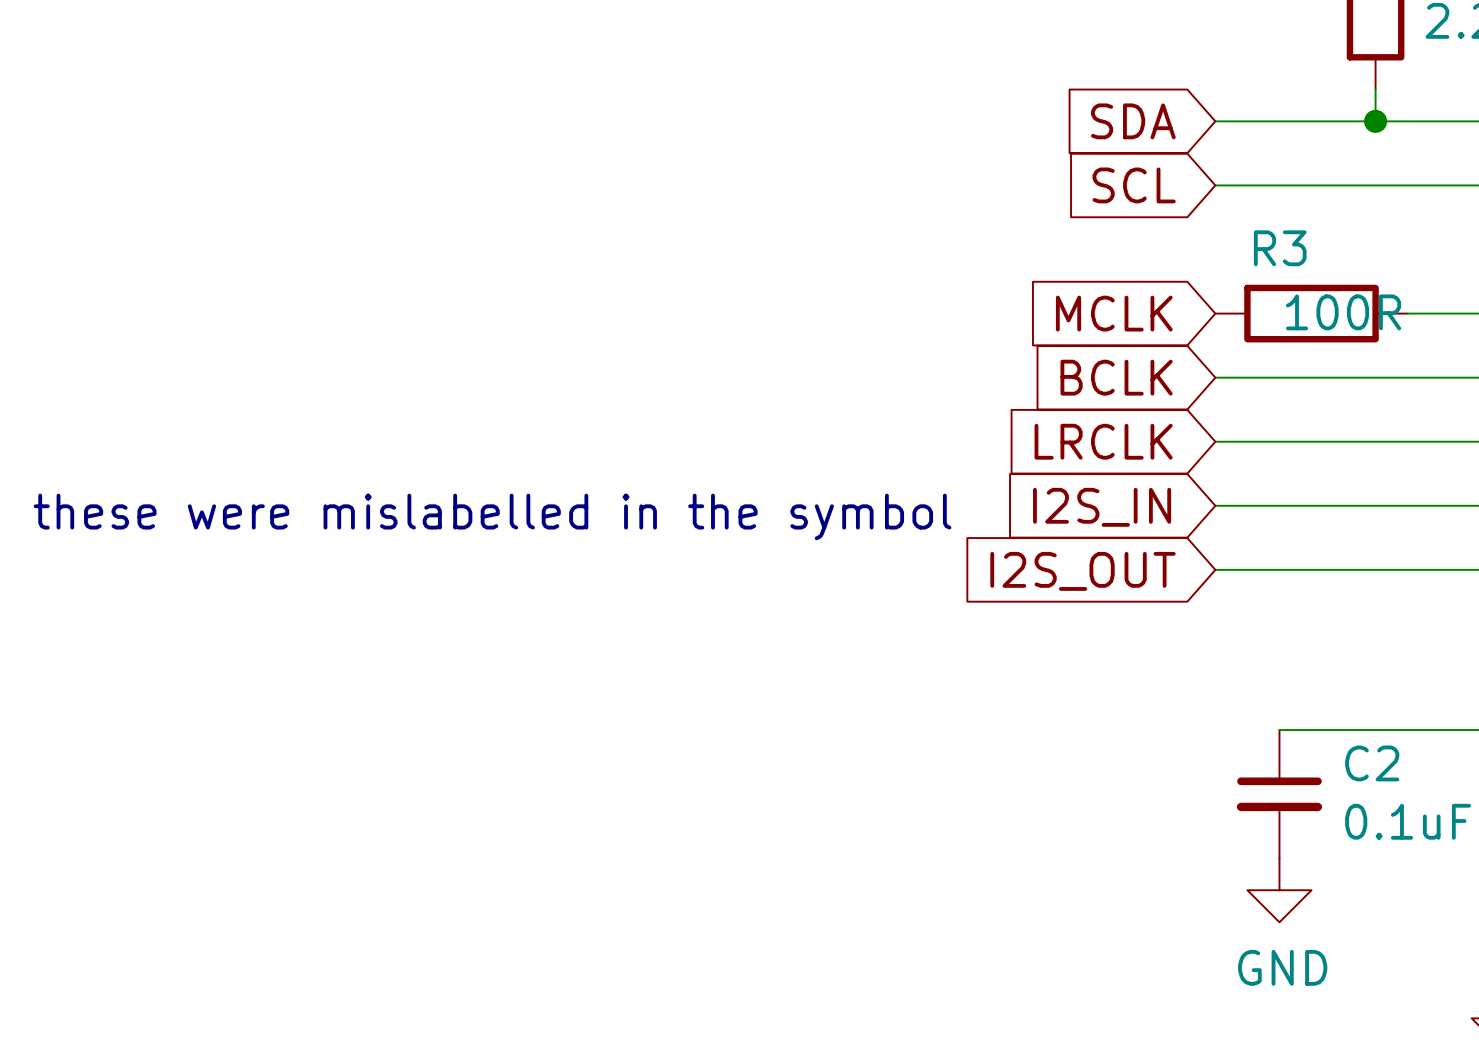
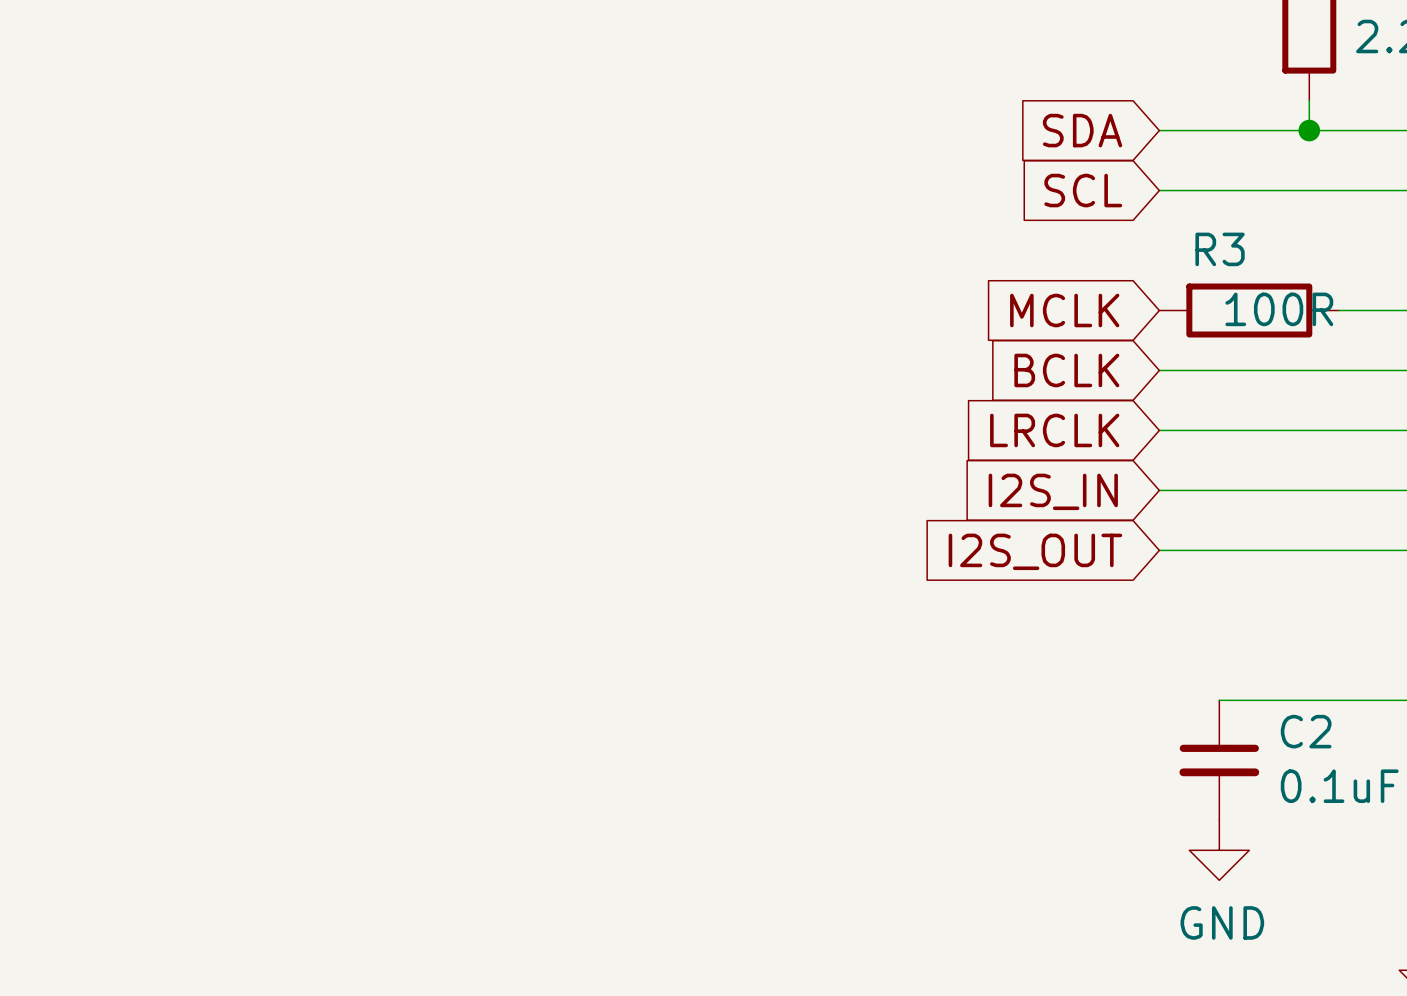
text: these were mislabelled in the symbol (492, 516) -> none

